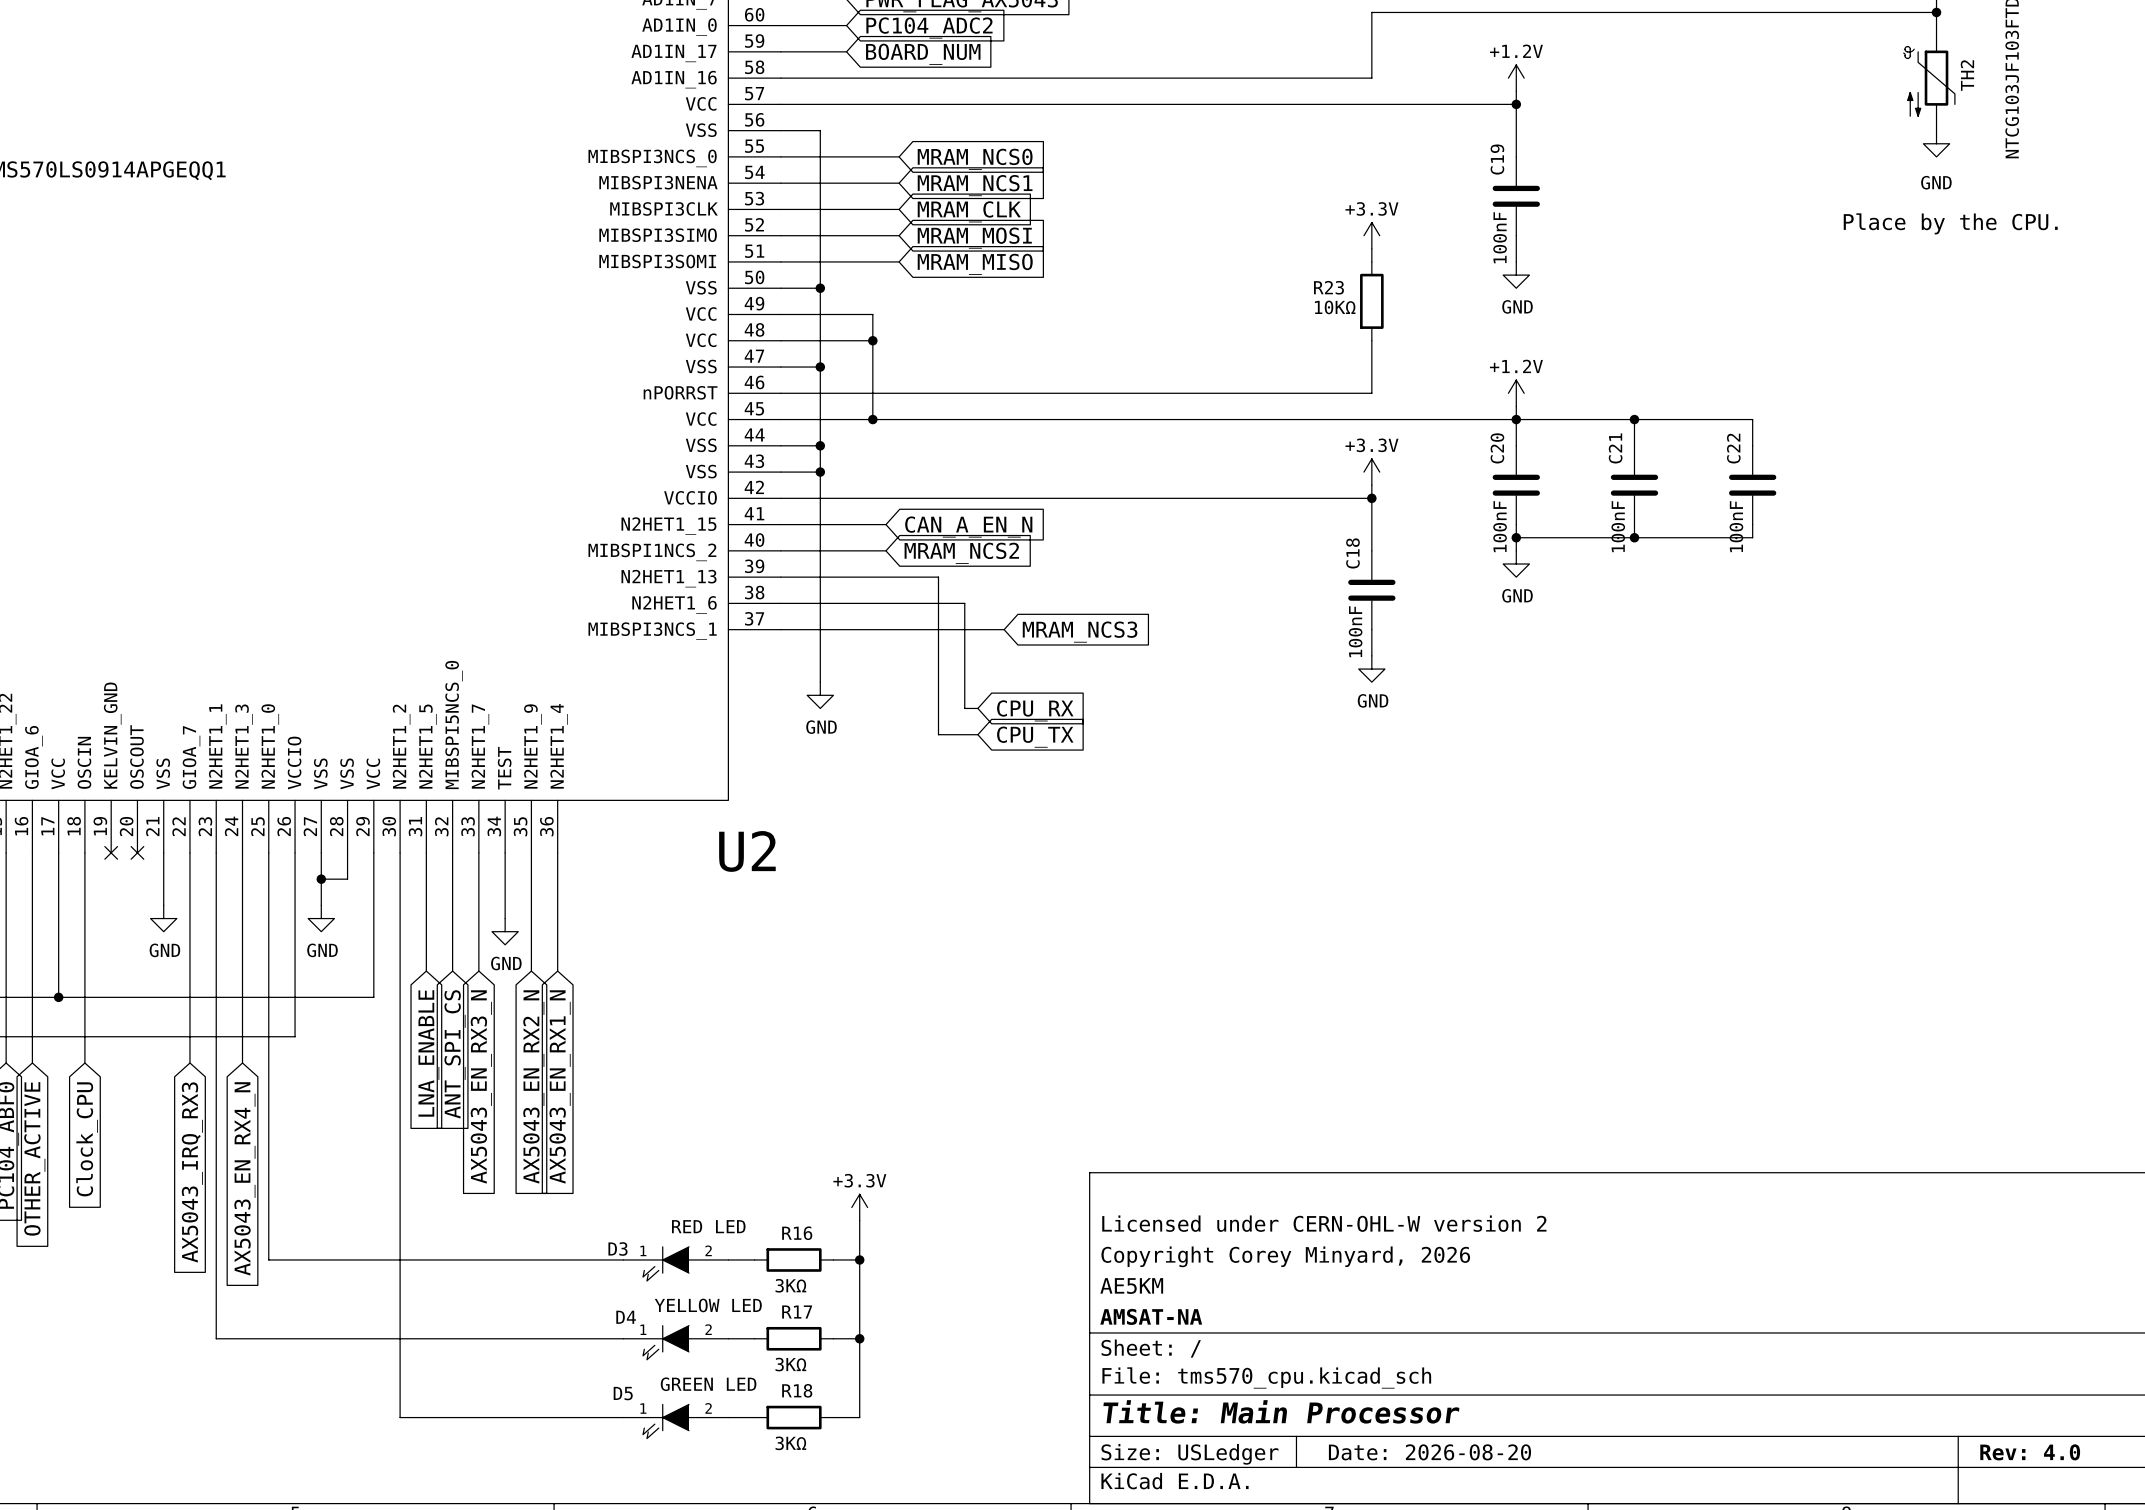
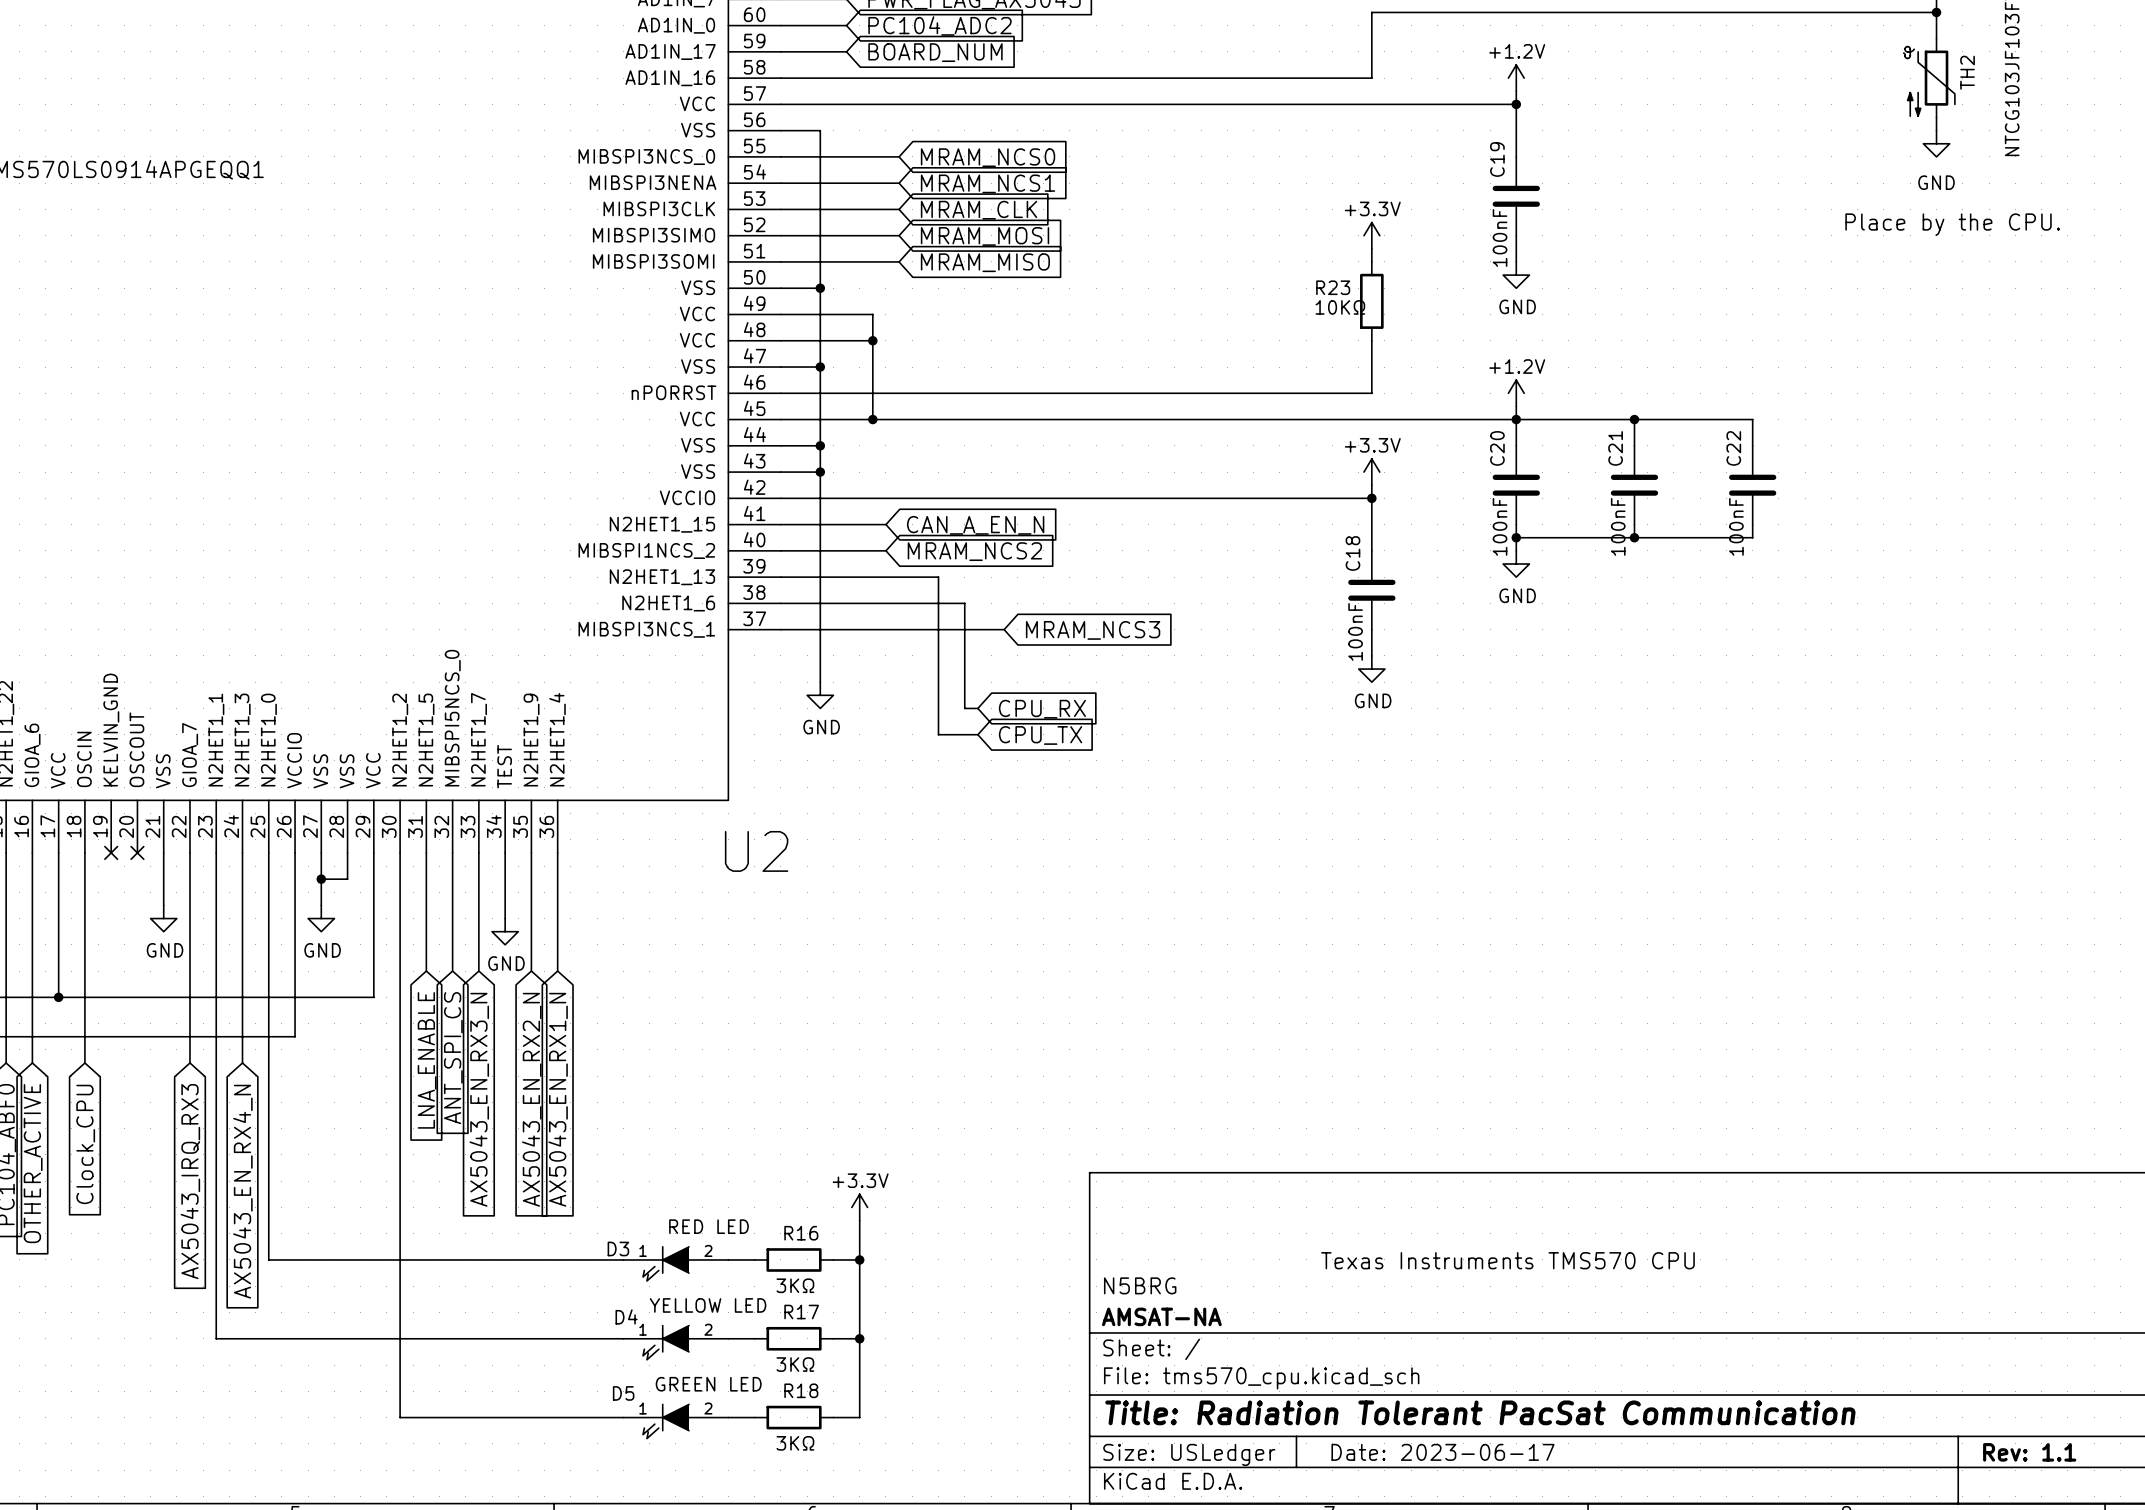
title block: Licensed under CERN-OHL-W version 2 (1324, 1223) -> none
title block: Copyright Corey Minyard, 2026 (1285, 1256) -> none
text: none -> Texas Instruments TMS570 CPU (1507, 1260)
title block: AE5KM (1131, 1286) -> N5BRG (1140, 1285)
title block: Title: Main Processor (1281, 1411) -> Title: Radiation Tolerant PacSat Communication (1480, 1412)
title block: Date: 2026-08-20 (1429, 1452) -> Date: 2023-06-17 (1443, 1452)
title block: Rev: 4.0 (2030, 1452) -> Rev: 1.1 (2029, 1452)

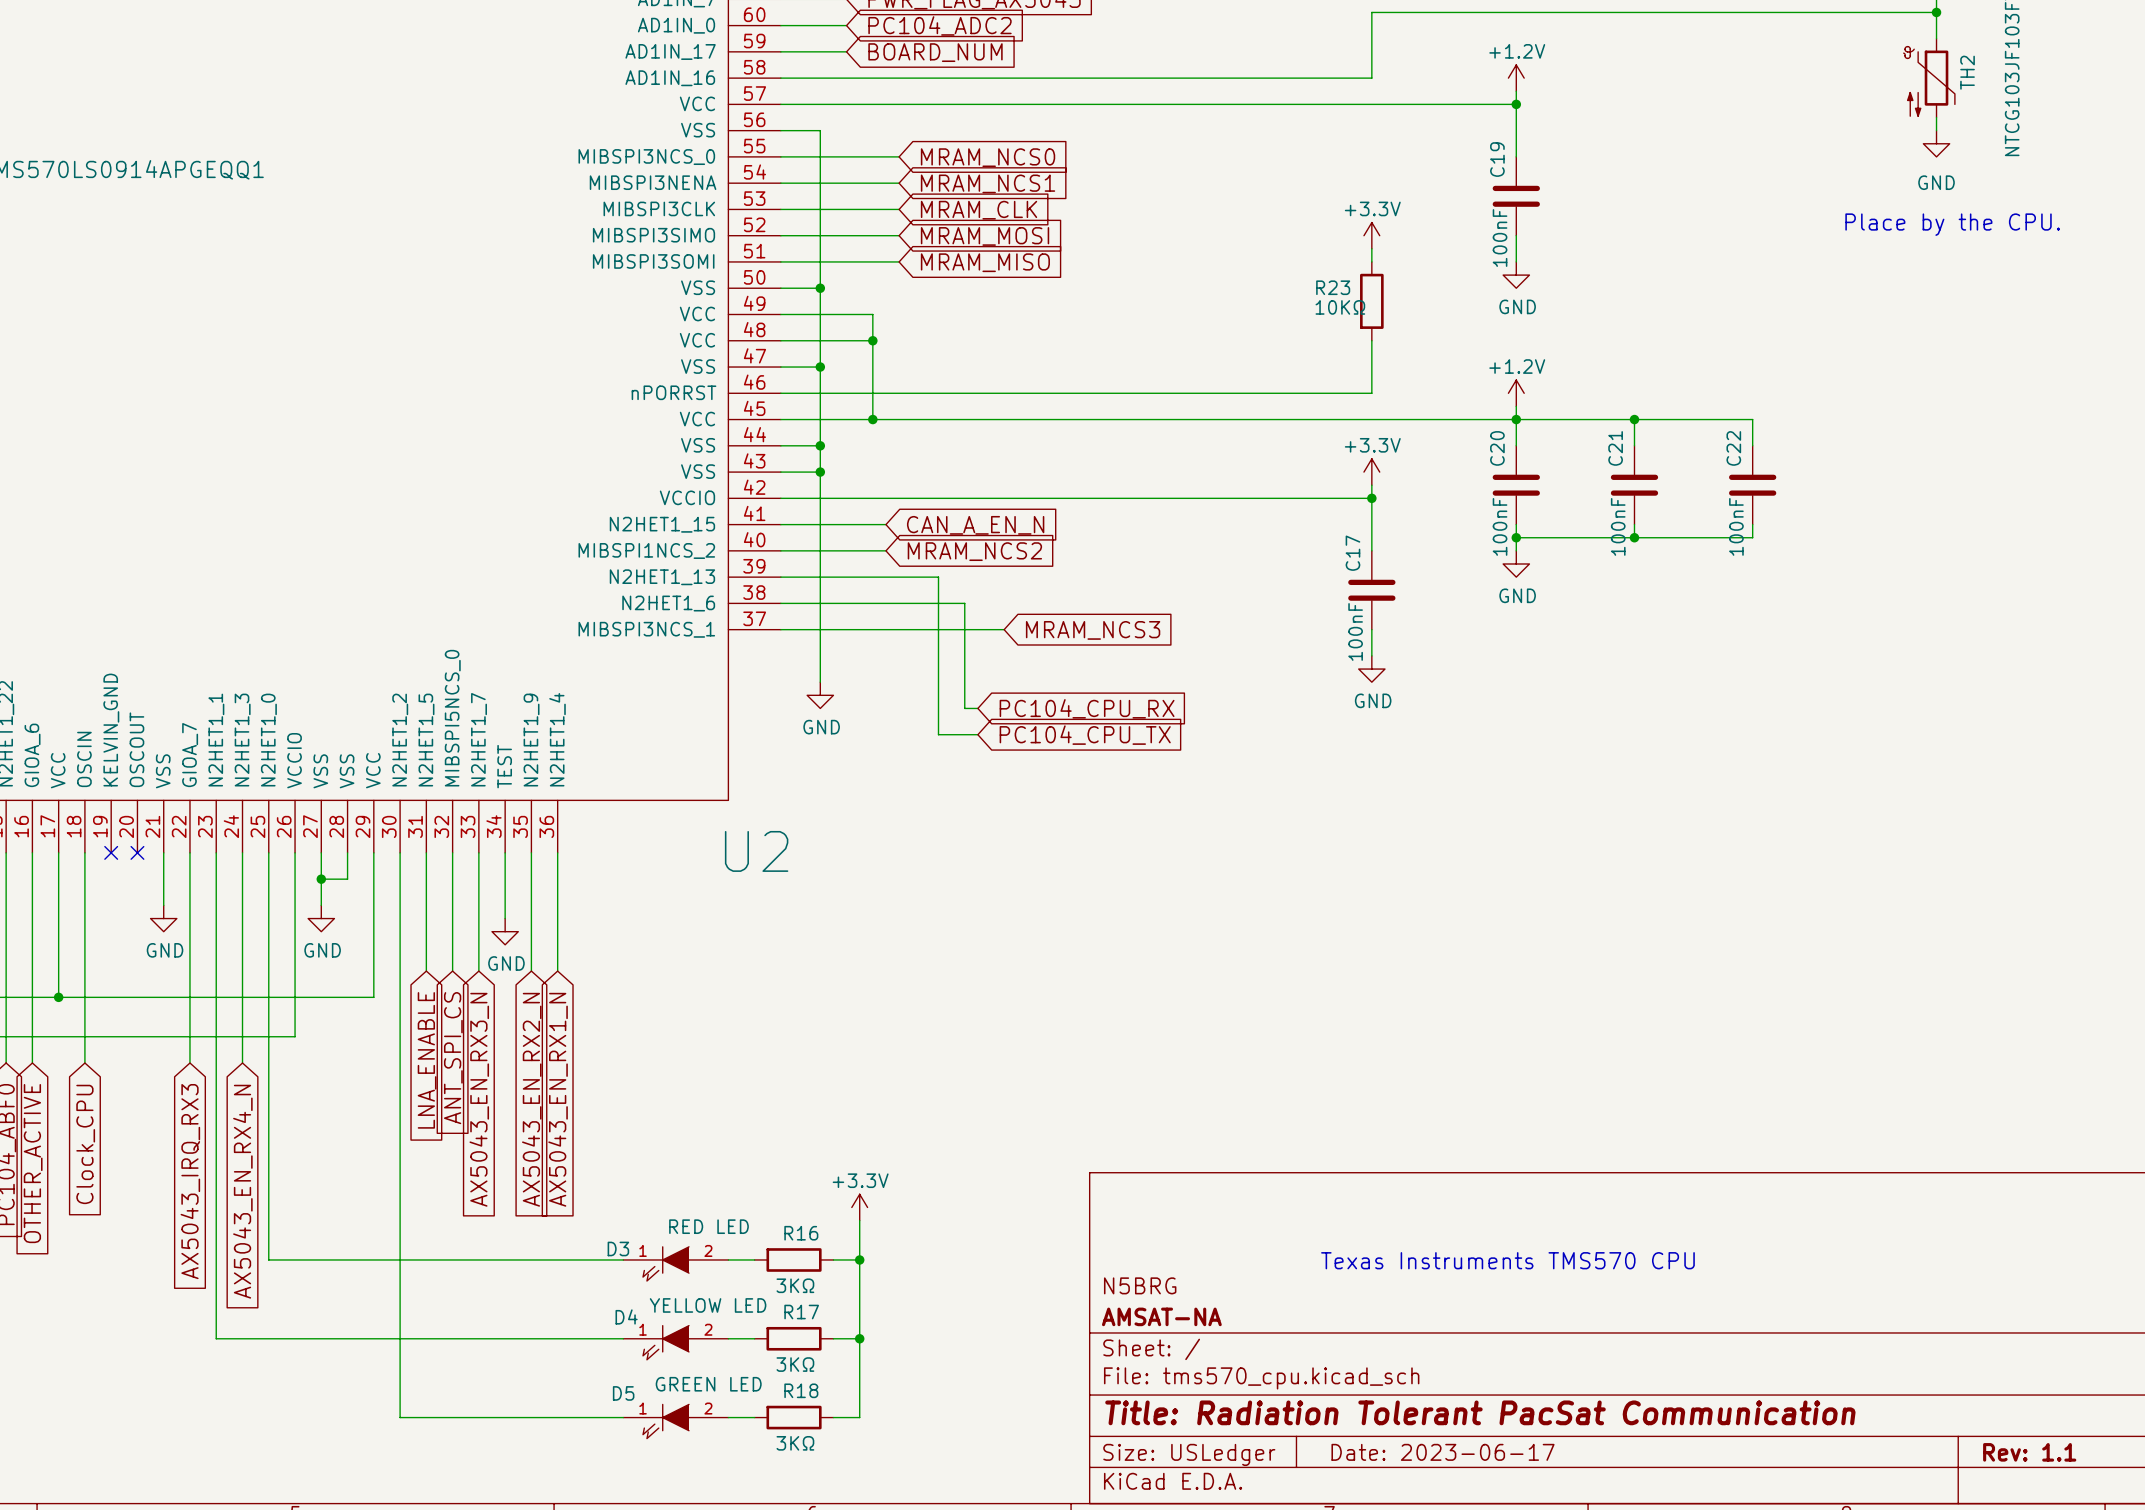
C18 name: C18 (1352, 553) -> C17 (1352, 553)
global label: CPU_RX (1042, 709) -> PC104_CPU_RX (1087, 708)
global label: CPU_TX (1040, 735) -> PC104_CPU_TX (1085, 735)

